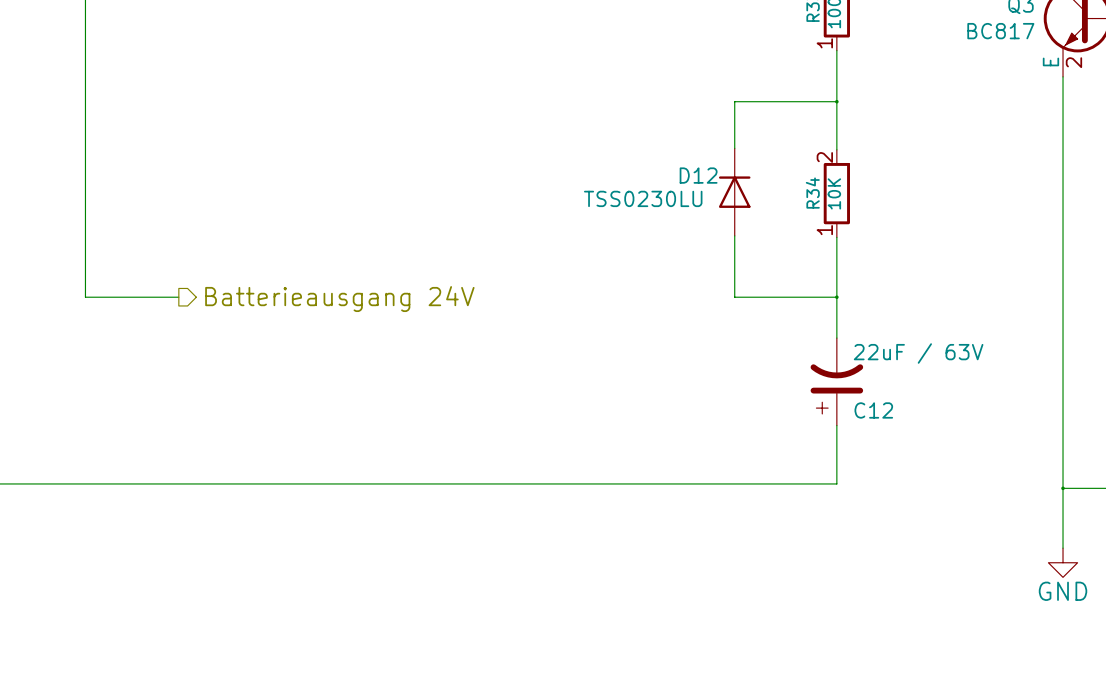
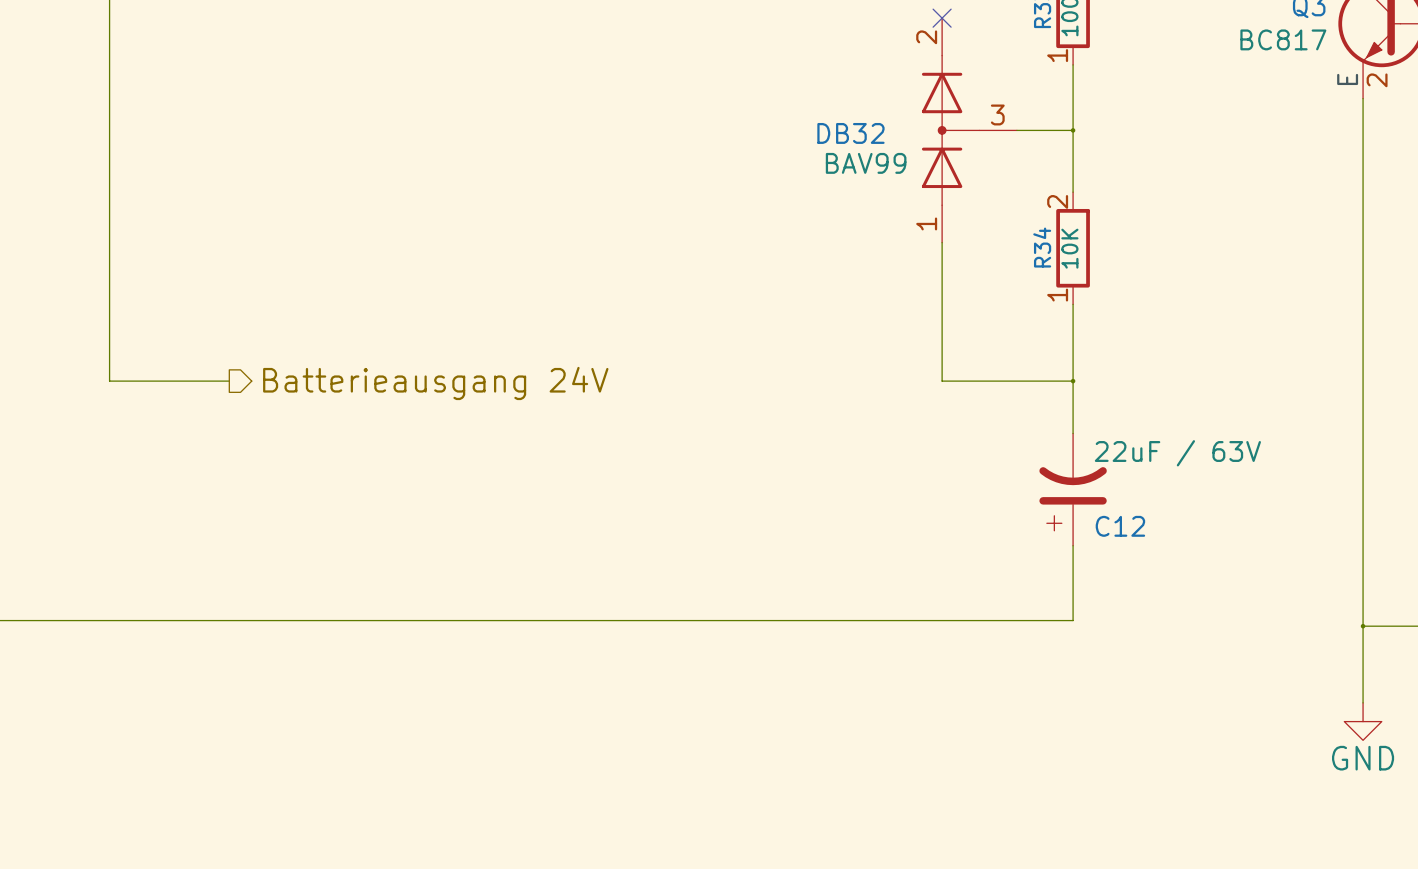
no-connect mark: none -> (942, 18)
DB32: none -> BAV99 (969, 130)
D12: TSS0230LU (734, 192) -> none

